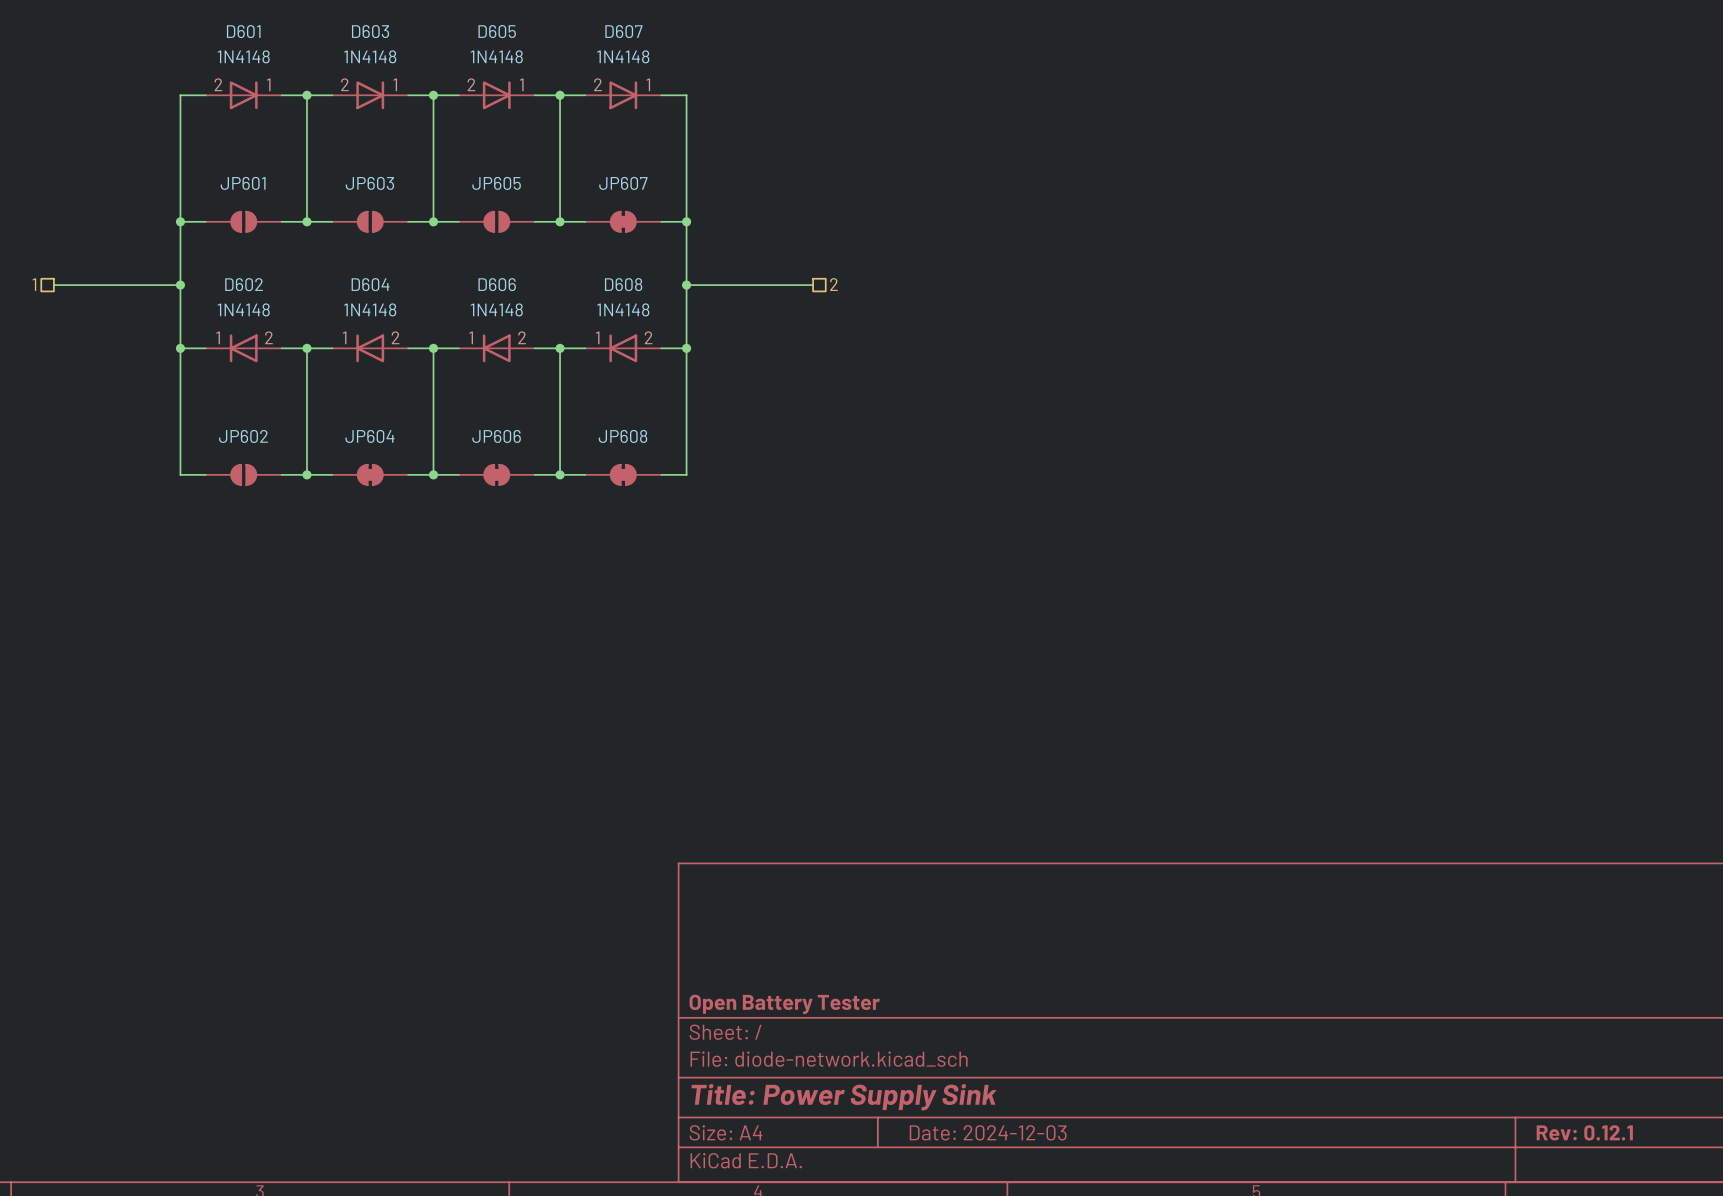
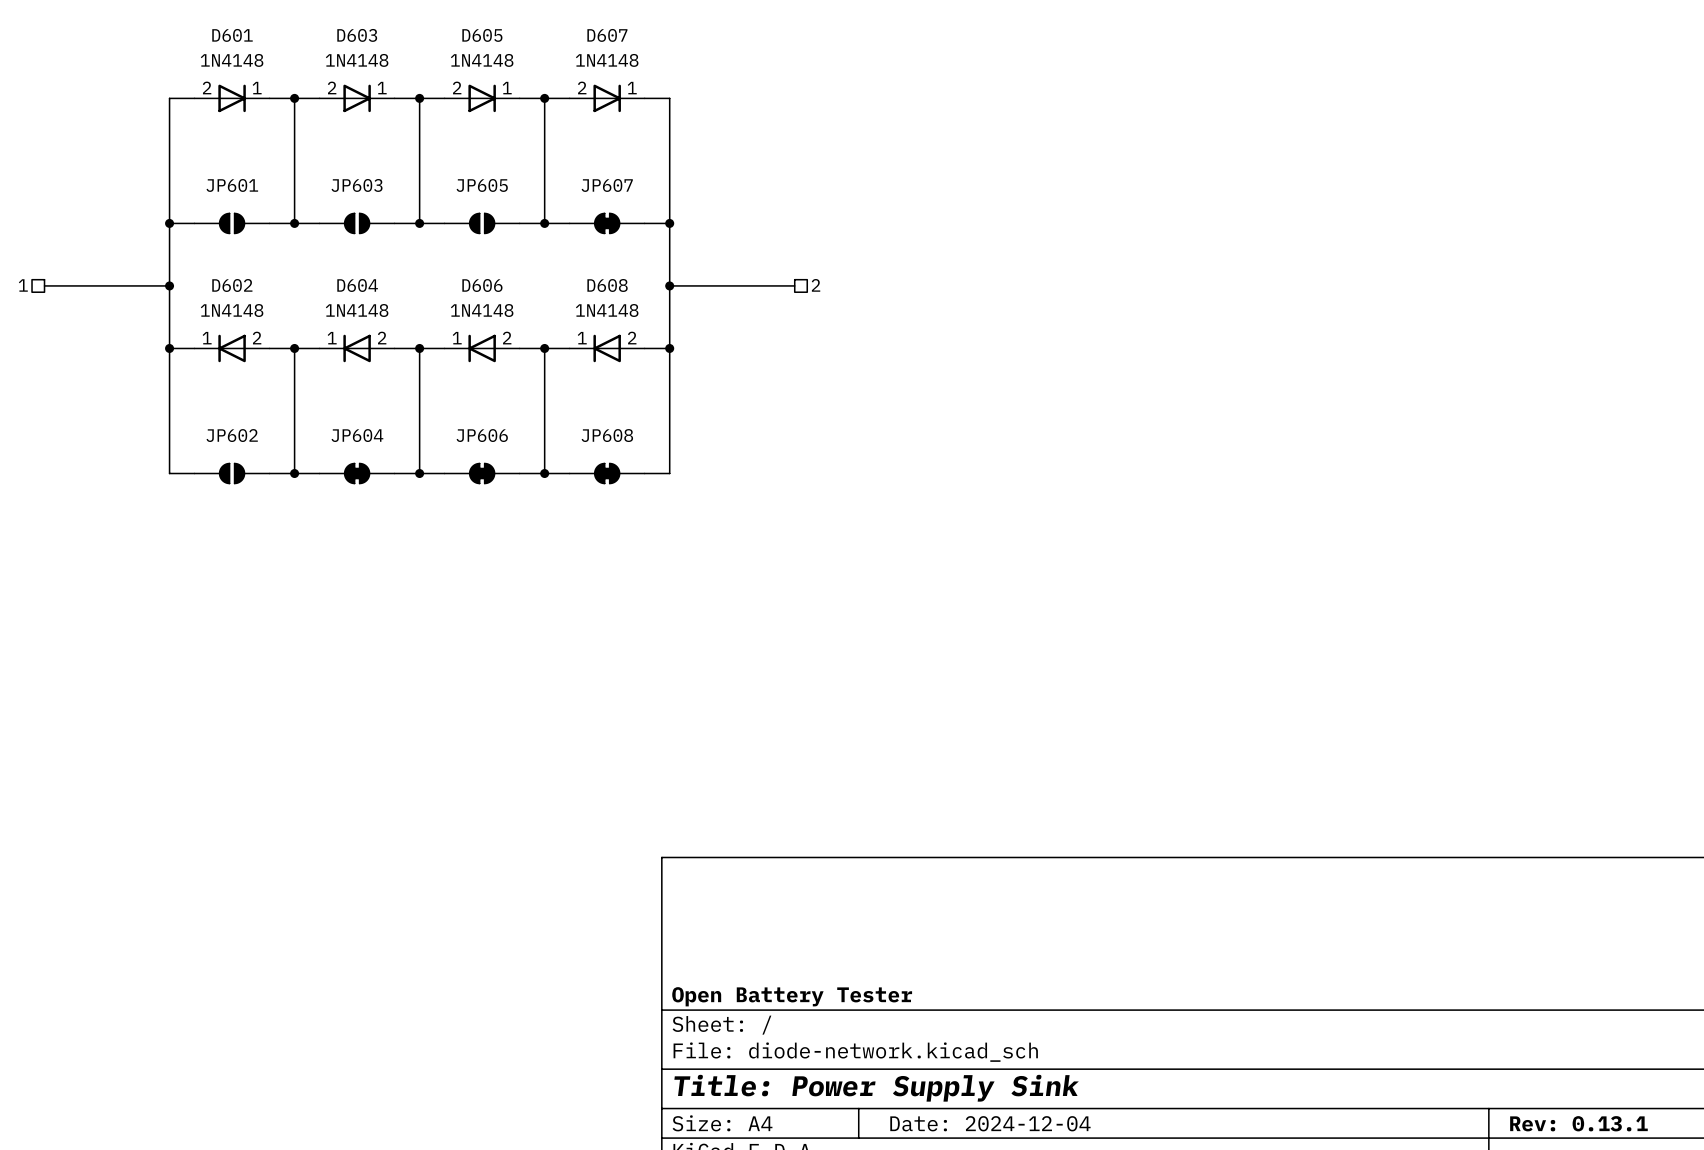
title block: Date: 2024-12-03 (988, 1132) -> Date: 2024-12-04 (990, 1123)
title block: Rev: 0.12.1 (1584, 1132) -> Rev: 0.13.1 (1578, 1123)

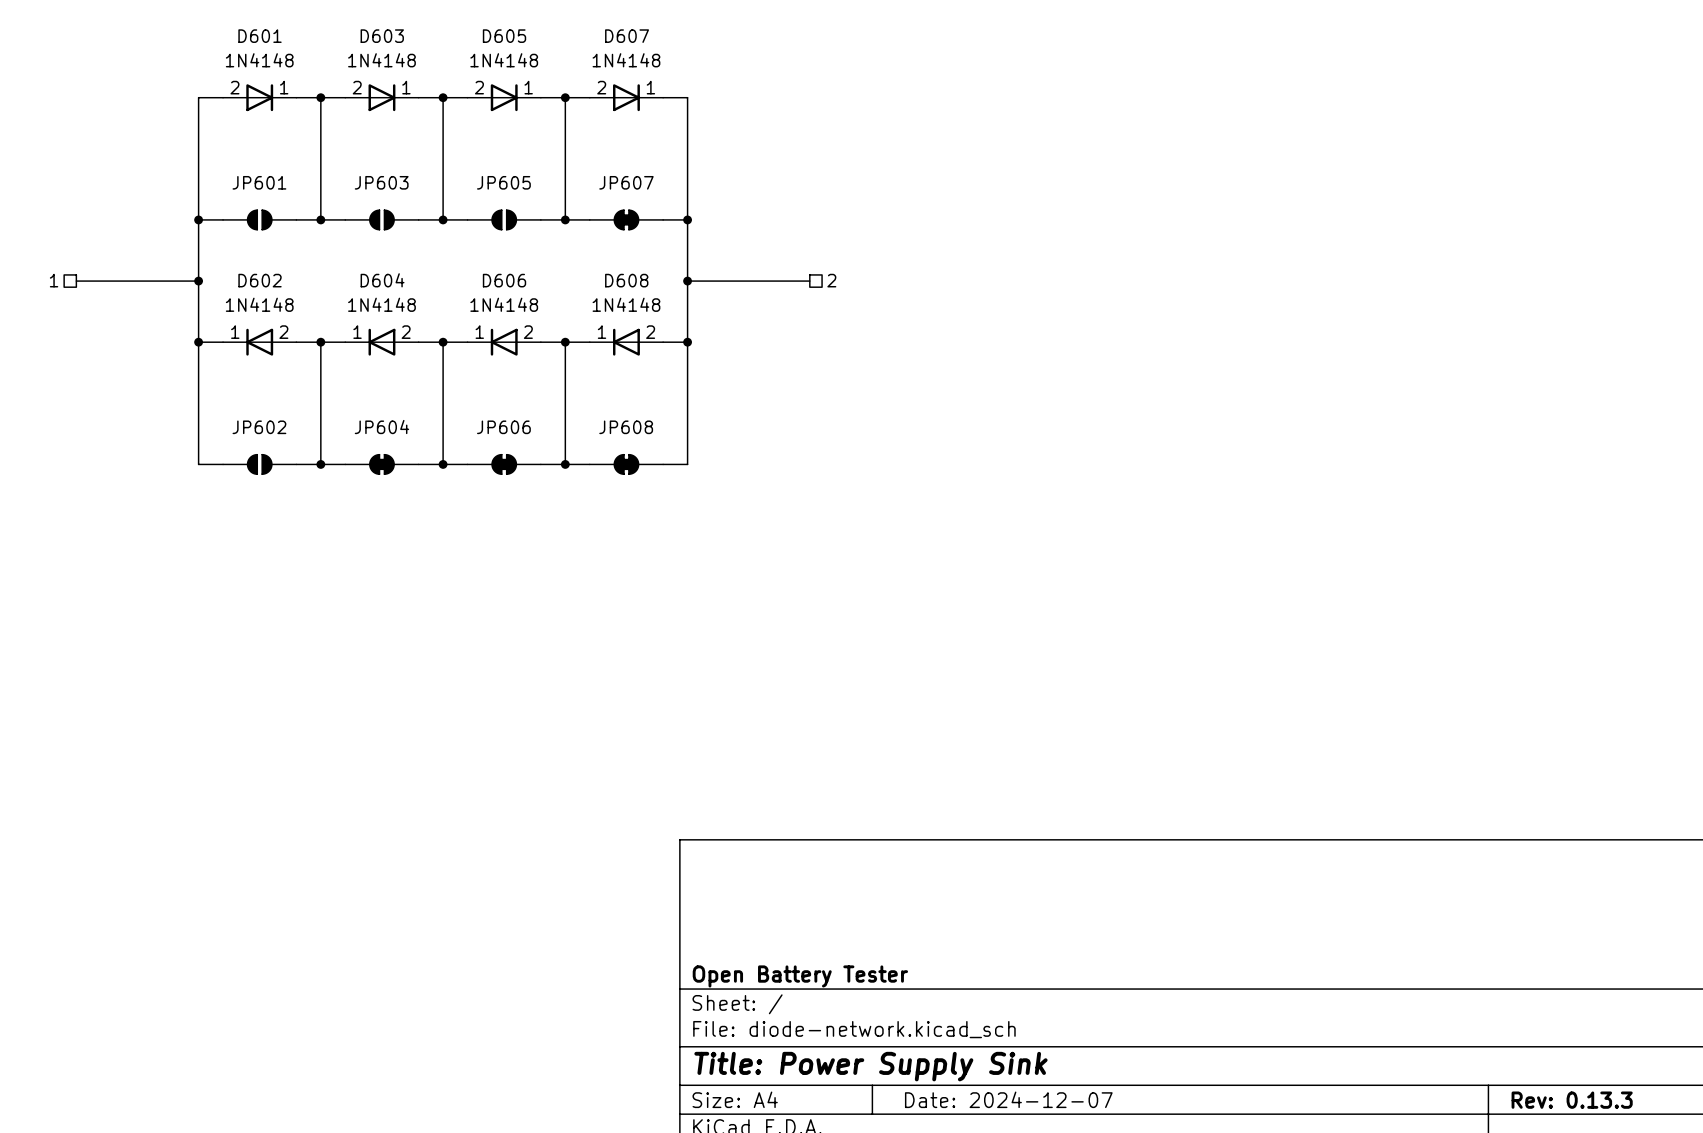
title block: Date: 2024-12-04 (990, 1123) -> Date: 2024-12-07 (1008, 1099)
title block: Rev: 0.13.1 (1578, 1123) -> Rev: 0.13.3 (1572, 1100)

